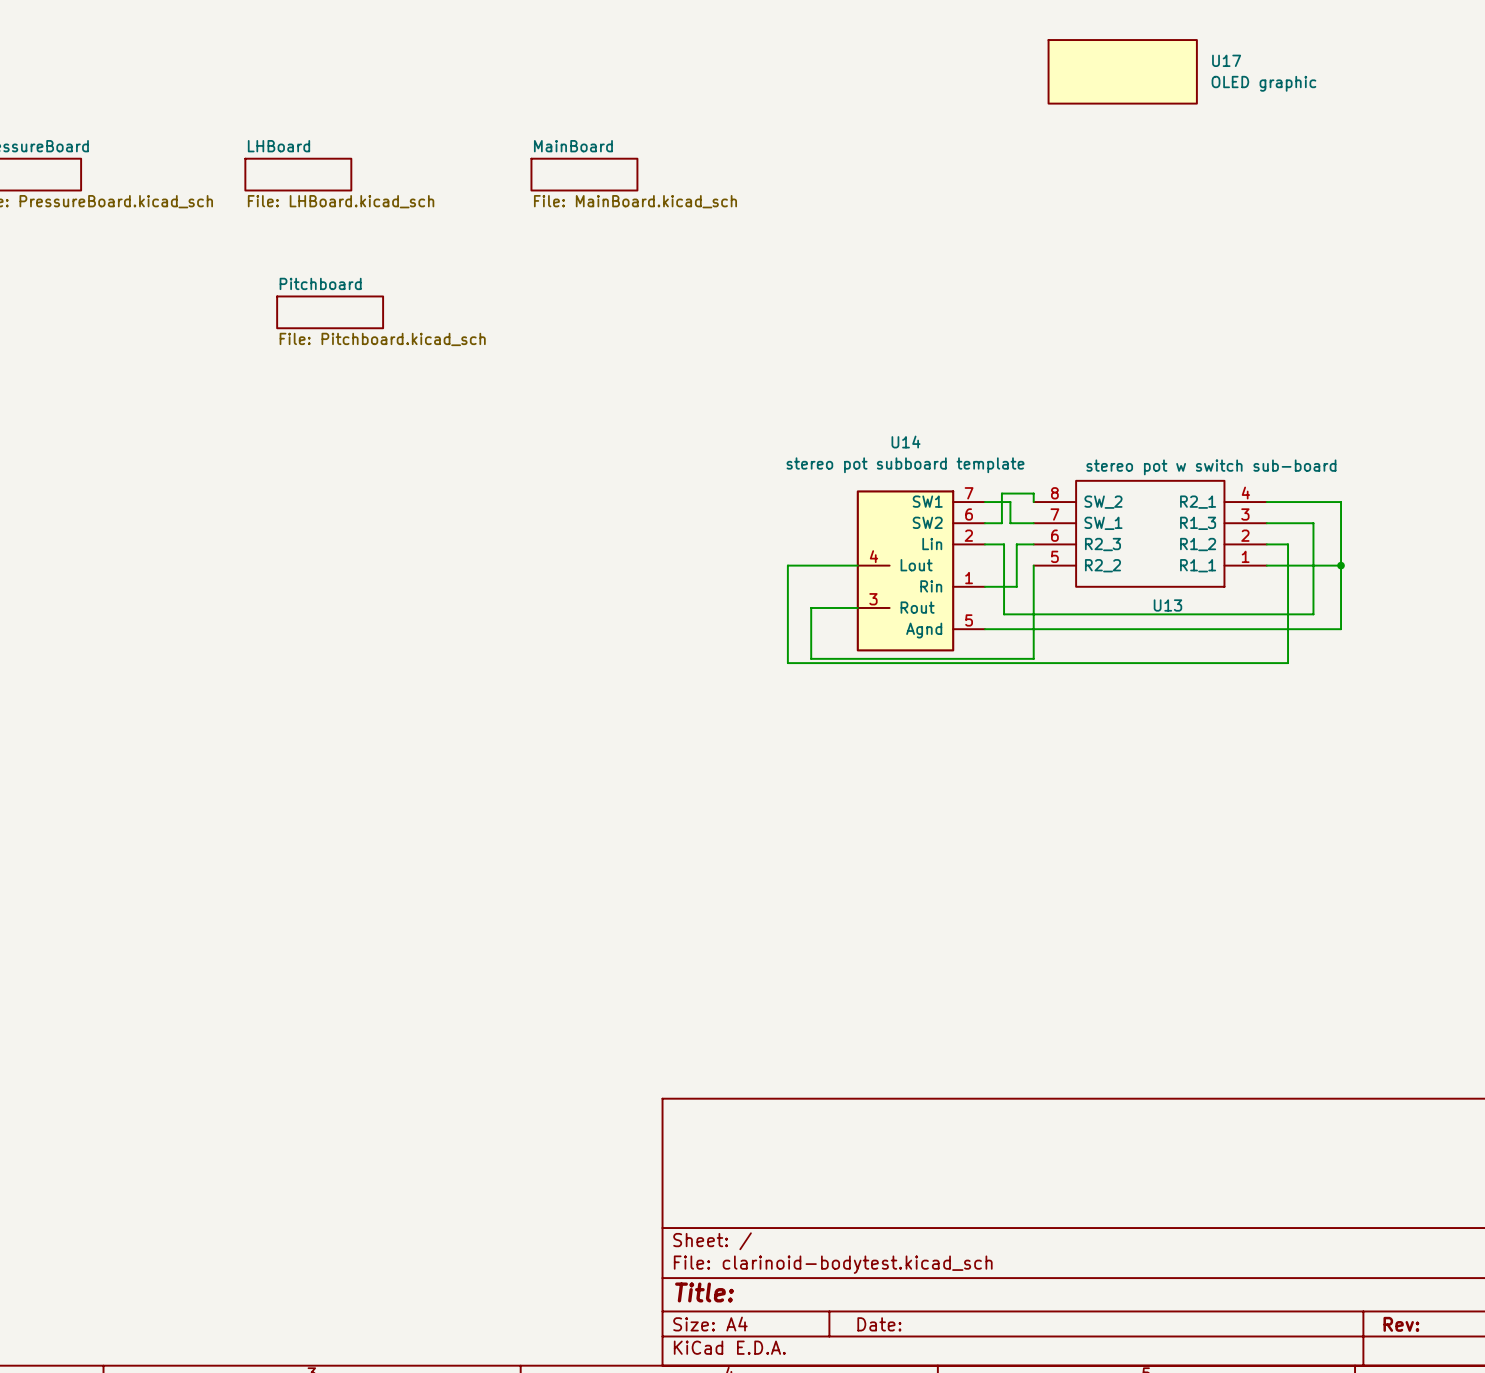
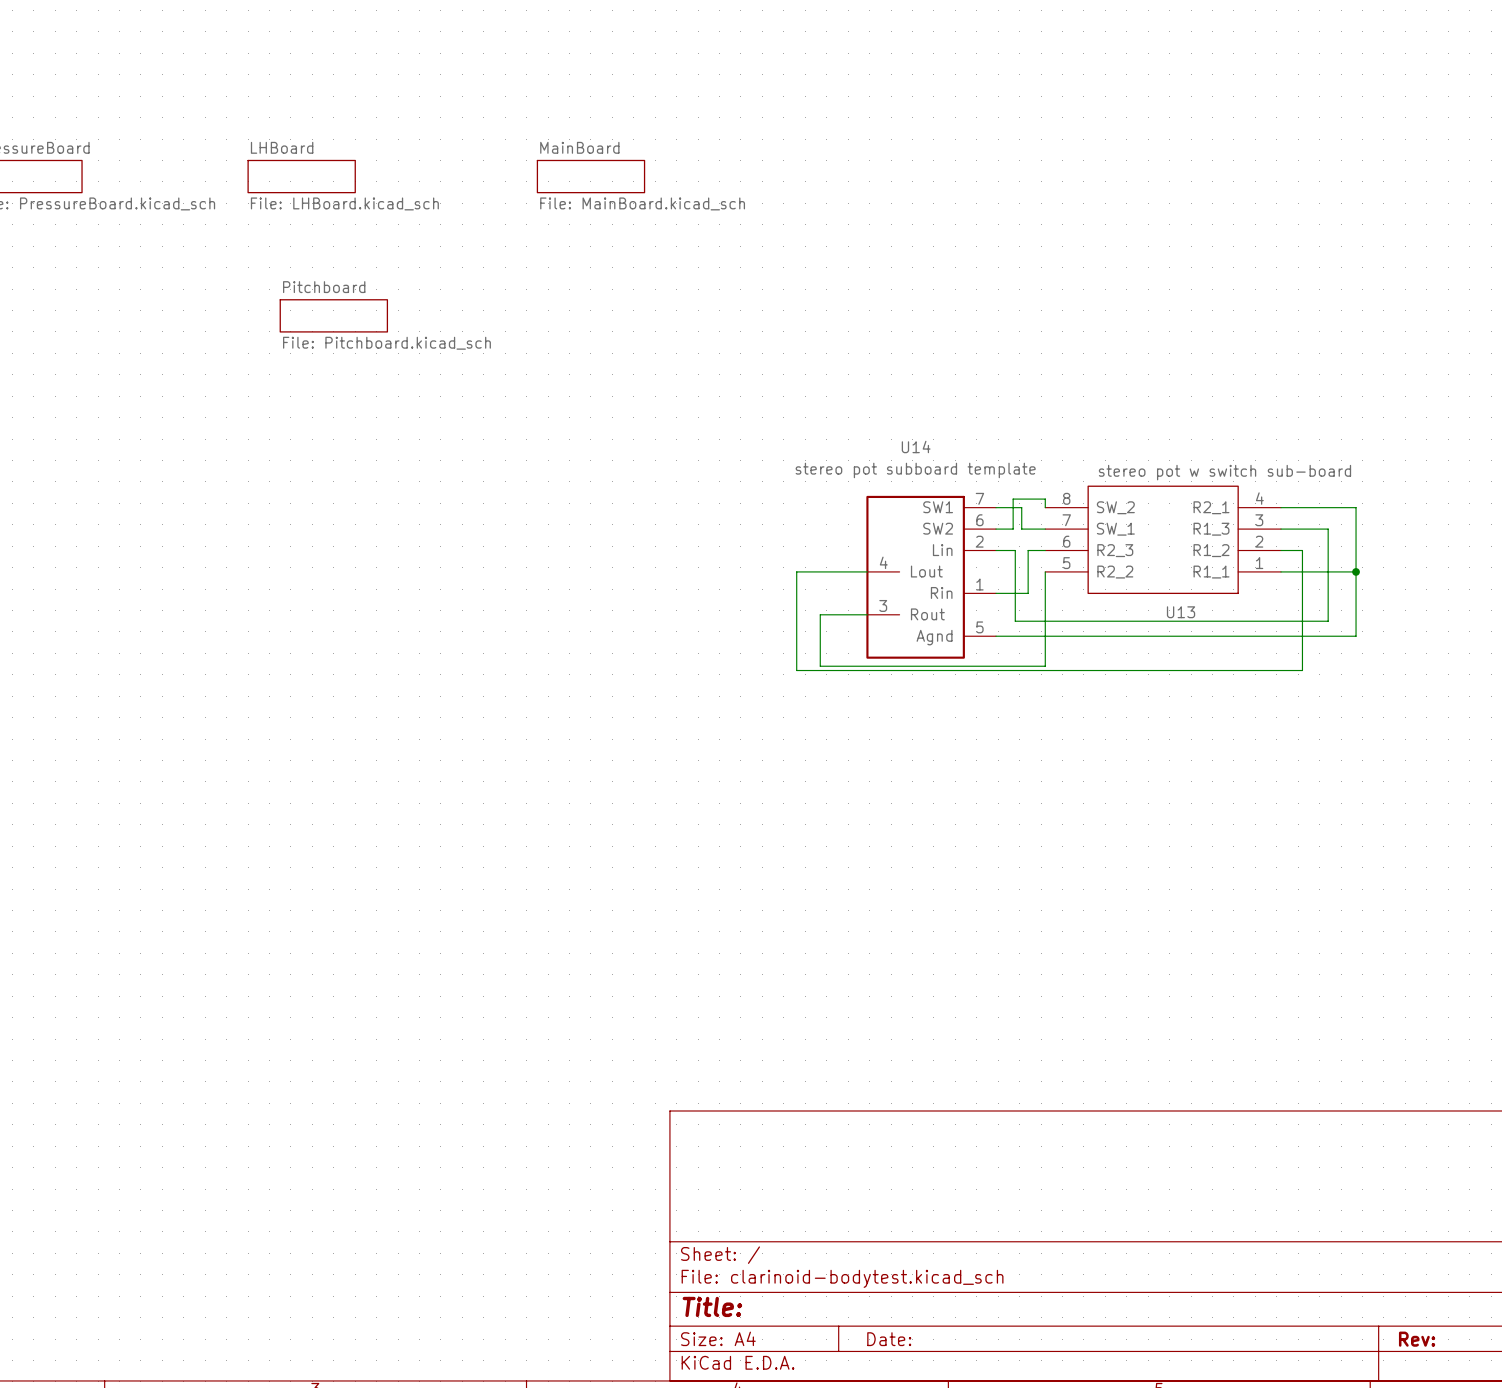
U17: OLED graphic (1122, 71) -> none

